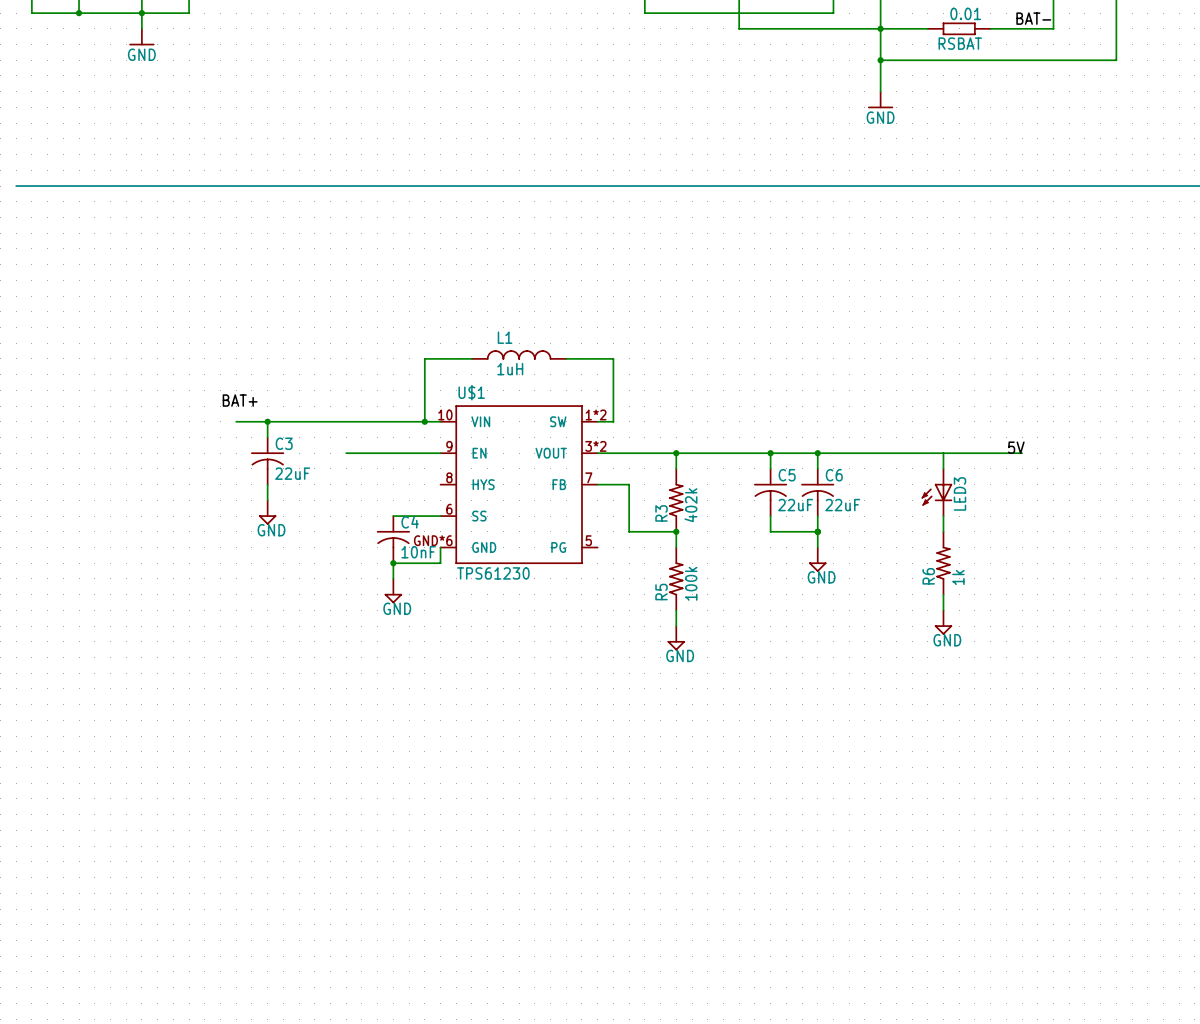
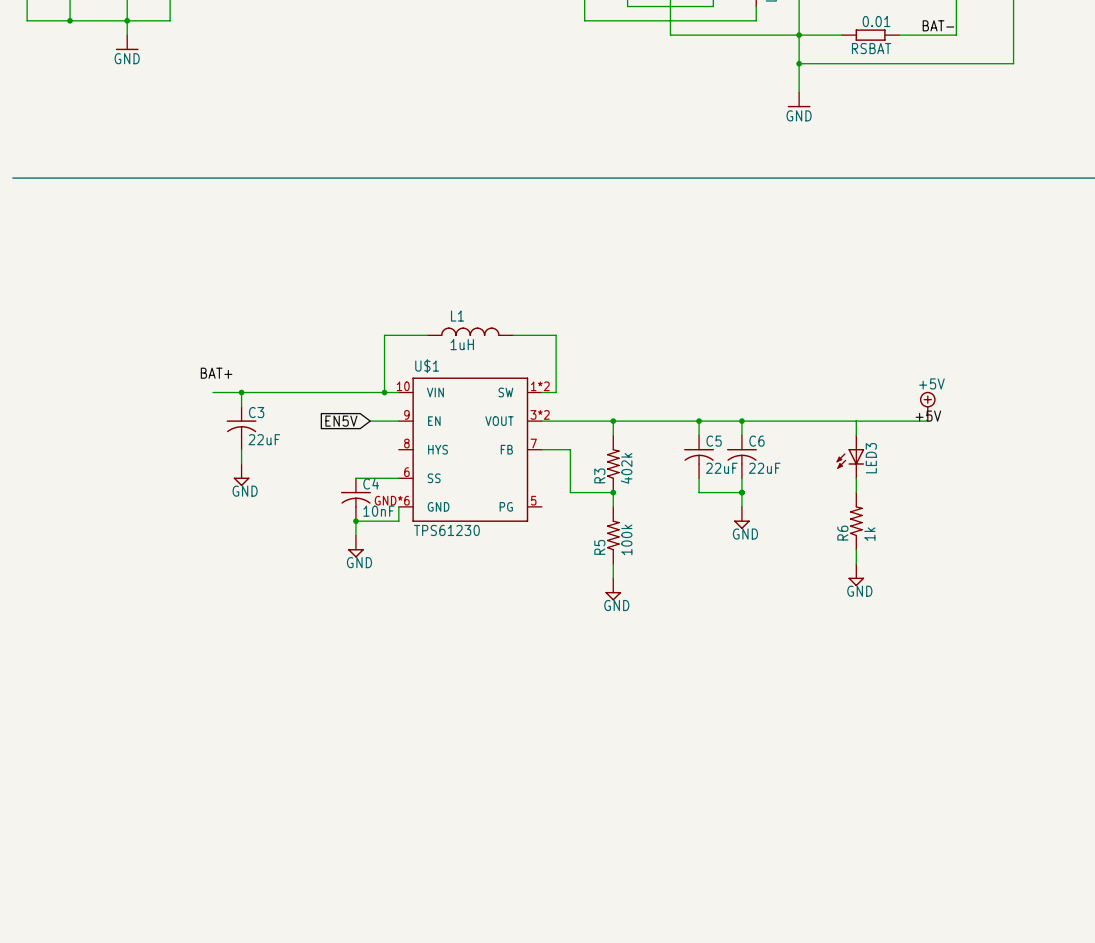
power symbol: none -> +5V (927, 406)
label: 5V (1016, 447) -> +5V (928, 416)
wire: (346, 453) (409, 453) -> none
global label: none -> EN5V (341, 421)

